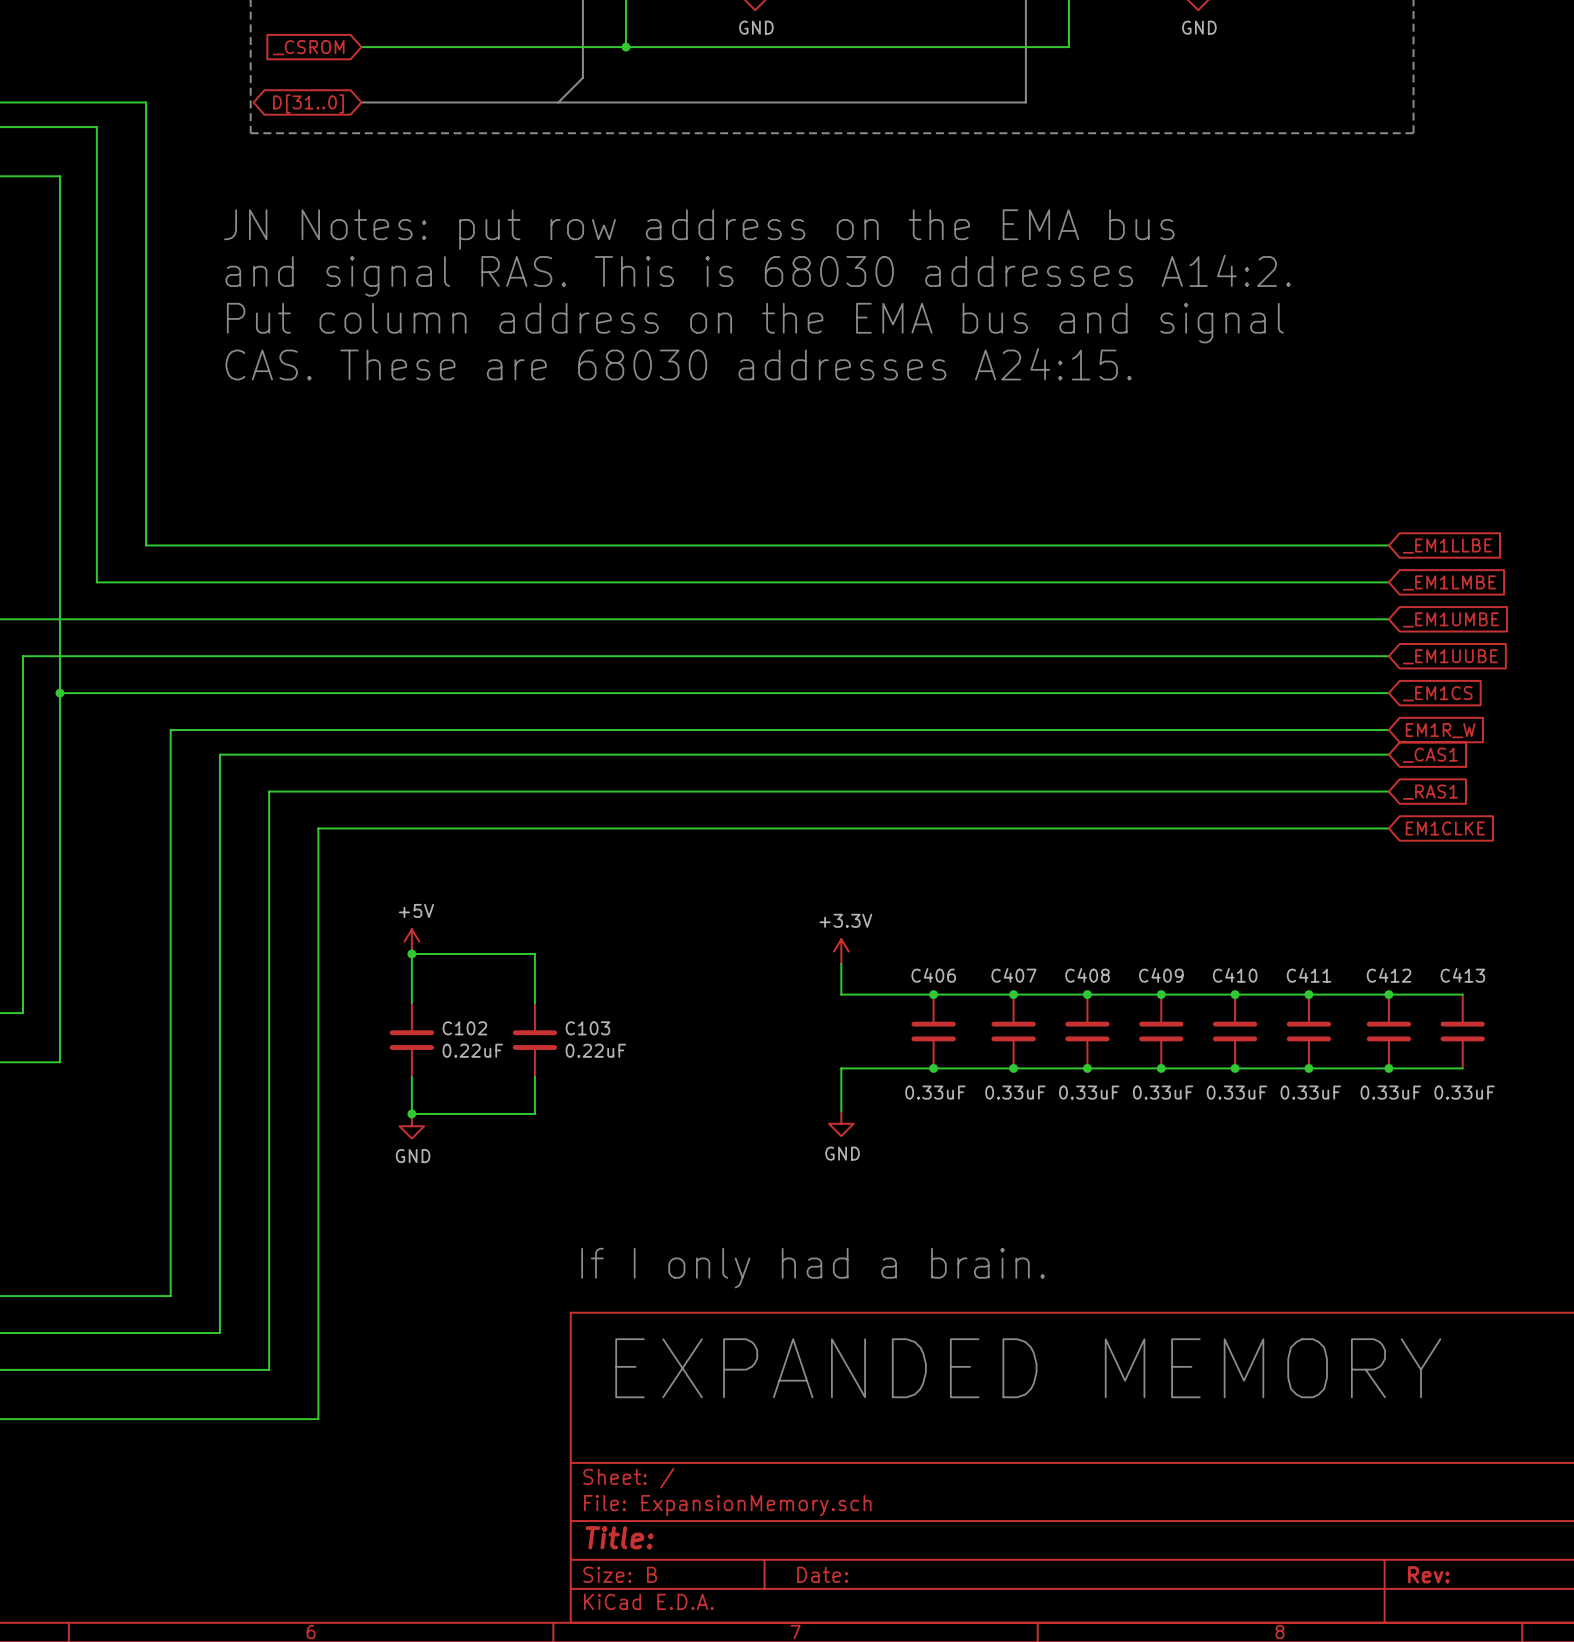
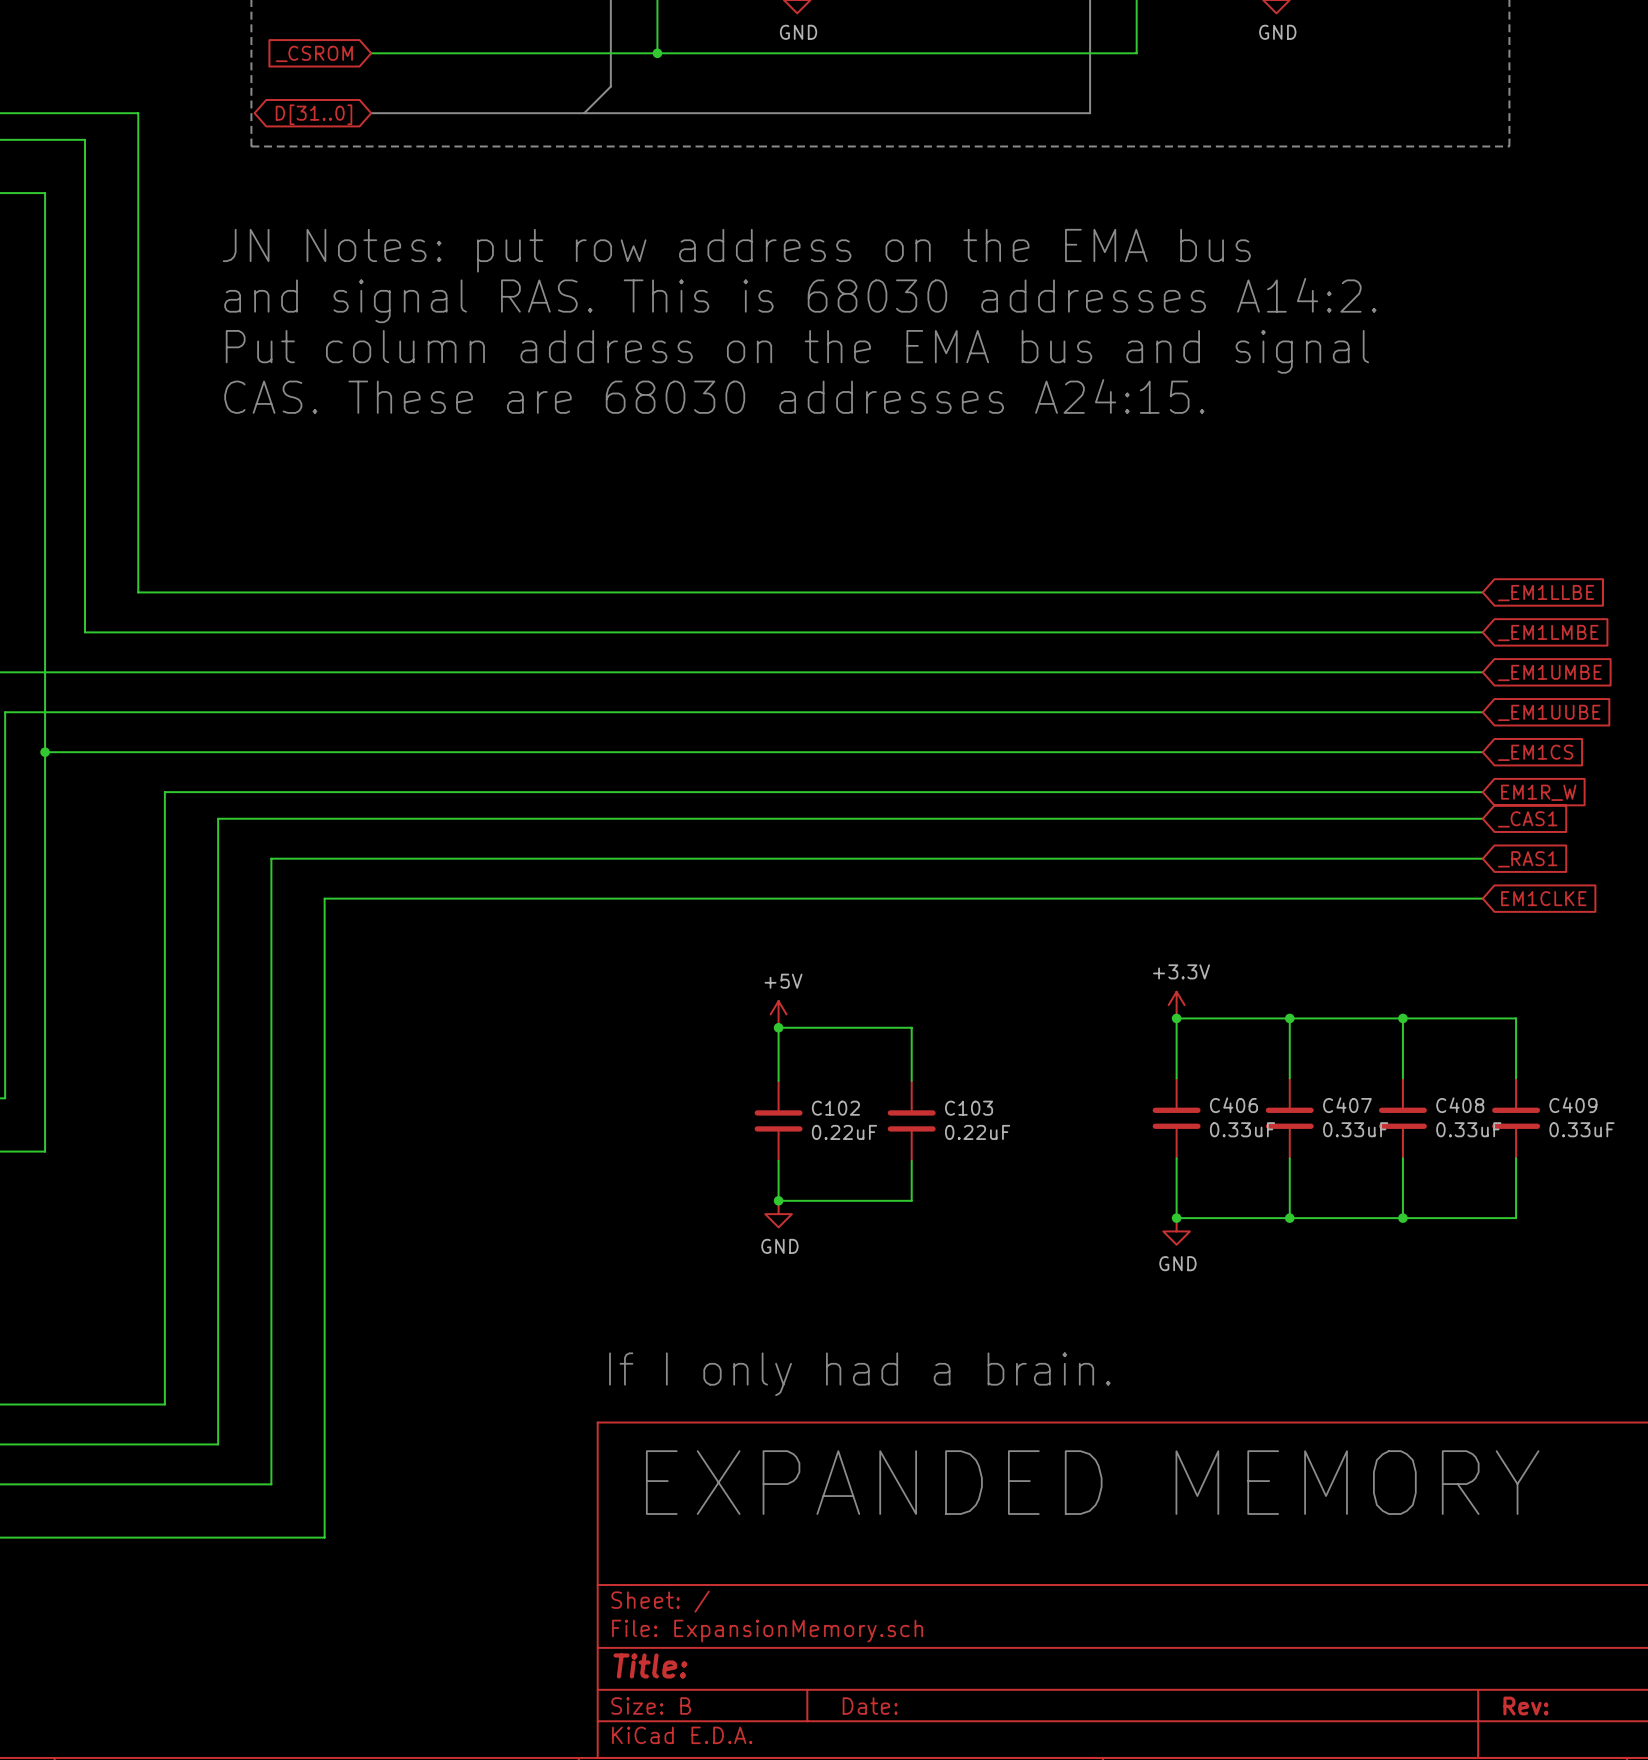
power symbol: none -> +3.3V (1176, 1005)
power symbol: none -> +5V (778, 1014)
junction: none -> (1176, 1018)
wire: none -> (1289, 1018) (1289, 1078)
junction: none -> (1289, 1018)
wire: none -> (1402, 1018) (1402, 1078)
junction: none -> (1402, 1018)
power symbol: +5V (411, 941) -> none
junction: none -> (778, 1027)
power symbol: +3.3V (841, 951) -> none
junction: (411, 953) -> none
wire: (841, 963) (841, 994) (1462, 994) -> none
C406 name position: C406 (933, 975) -> C406 (1233, 1105)
C407 name position: C407 (1013, 975) -> C407 (1347, 1105)
C408 name position: C408 (1087, 975) -> C408 (1460, 1105)
C409 name position: C409 (1161, 975) -> C409 (1573, 1105)
junction: (933, 994) -> none
junction: (1013, 994) -> none
junction: (1087, 994) -> none
wire: none -> (1176, 1078) (1176, 1018) (1516, 1018) (1516, 1078)
junction: (1161, 994) -> none
junction: (1235, 994) -> none
junction: (1308, 994) -> none
junction: (1388, 994) -> none
wire: none -> (778, 1081) (778, 1027) (911, 1027) (911, 1081)
wire: (411, 1003) (411, 953) (534, 953) (534, 1003) -> none
C406 position: (933, 1031) -> (1176, 1118)
C407 position: (1013, 1031) -> (1289, 1118)
C408 position: (1087, 1031) -> (1402, 1118)
C409 position: (1161, 1031) -> (1516, 1118)
C410: 0.33uF (1235, 1031) -> none
C411: 0.33uF (1308, 1031) -> none
C412: 0.33uF (1388, 1031) -> none
C413: 0.33uF (1462, 1031) -> none
C102 position: (411, 1040) -> (778, 1120)
C103 position: (534, 1040) -> (911, 1120)
junction: (933, 1068) -> none
junction: (1013, 1068) -> none
junction: (1087, 1068) -> none
wire: none -> (1176, 1158) (1176, 1218) (1516, 1218) (1516, 1158)
junction: (1161, 1068) -> none
wire: none -> (1289, 1158) (1289, 1218)
junction: (1235, 1068) -> none
junction: (1308, 1068) -> none
wire: none -> (1402, 1158) (1402, 1218)
junction: (1388, 1068) -> none
wire: (1462, 1068) (841, 1068) (841, 1111) -> none
wire: none -> (778, 1160) (778, 1200) (911, 1200) (911, 1160)
wire: (411, 1077) (411, 1113) (534, 1113) (534, 1077) -> none
C406 value position: 0.33uF (935, 1092) -> 0.33uF (1242, 1129)
C407 value position: 0.33uF (1015, 1092) -> 0.33uF (1355, 1129)
C408 value position: 0.33uF (1089, 1092) -> 0.33uF (1468, 1129)
C409 value position: 0.33uF (1163, 1092) -> 0.33uF (1581, 1129)
junction: none -> (778, 1200)
junction: (411, 1113) -> none
power symbol position: GND (841, 1123) -> GND (778, 1214)
junction: none -> (1176, 1218)
junction: none -> (1289, 1218)
junction: none -> (1402, 1218)
power symbol: GND (411, 1126) -> none
power symbol: none -> GND (1176, 1231)

